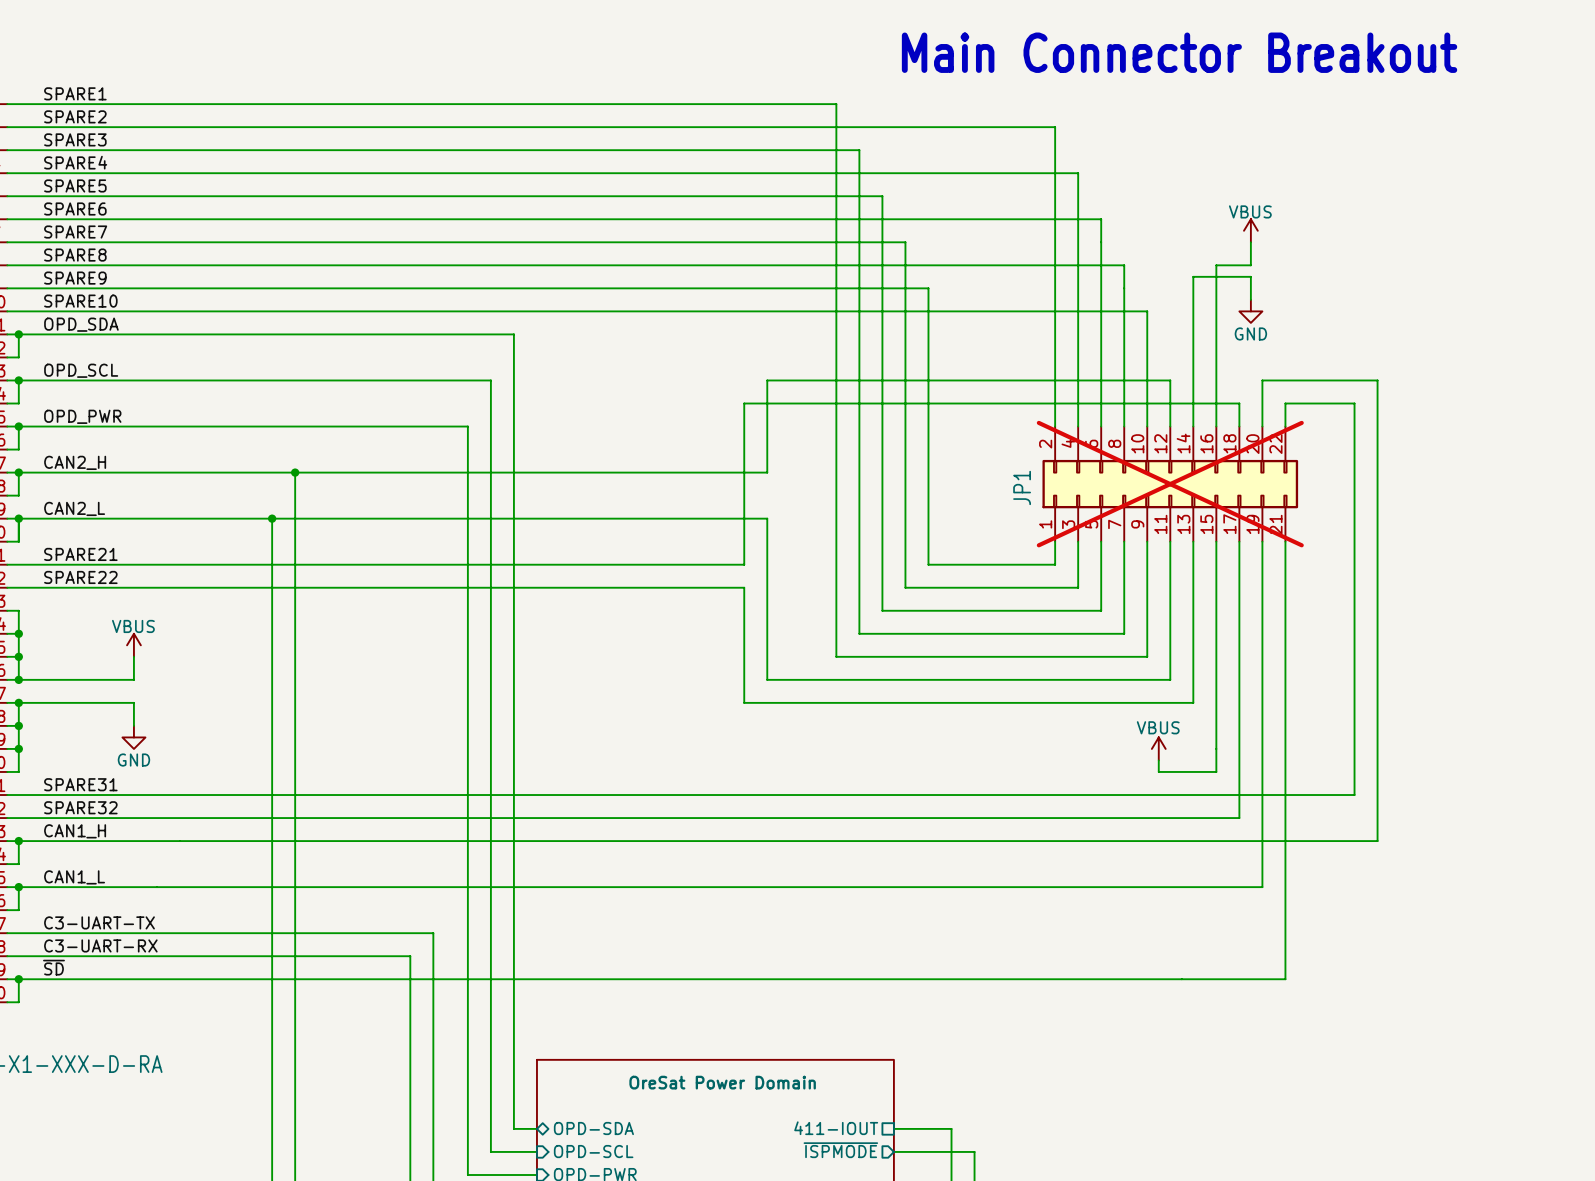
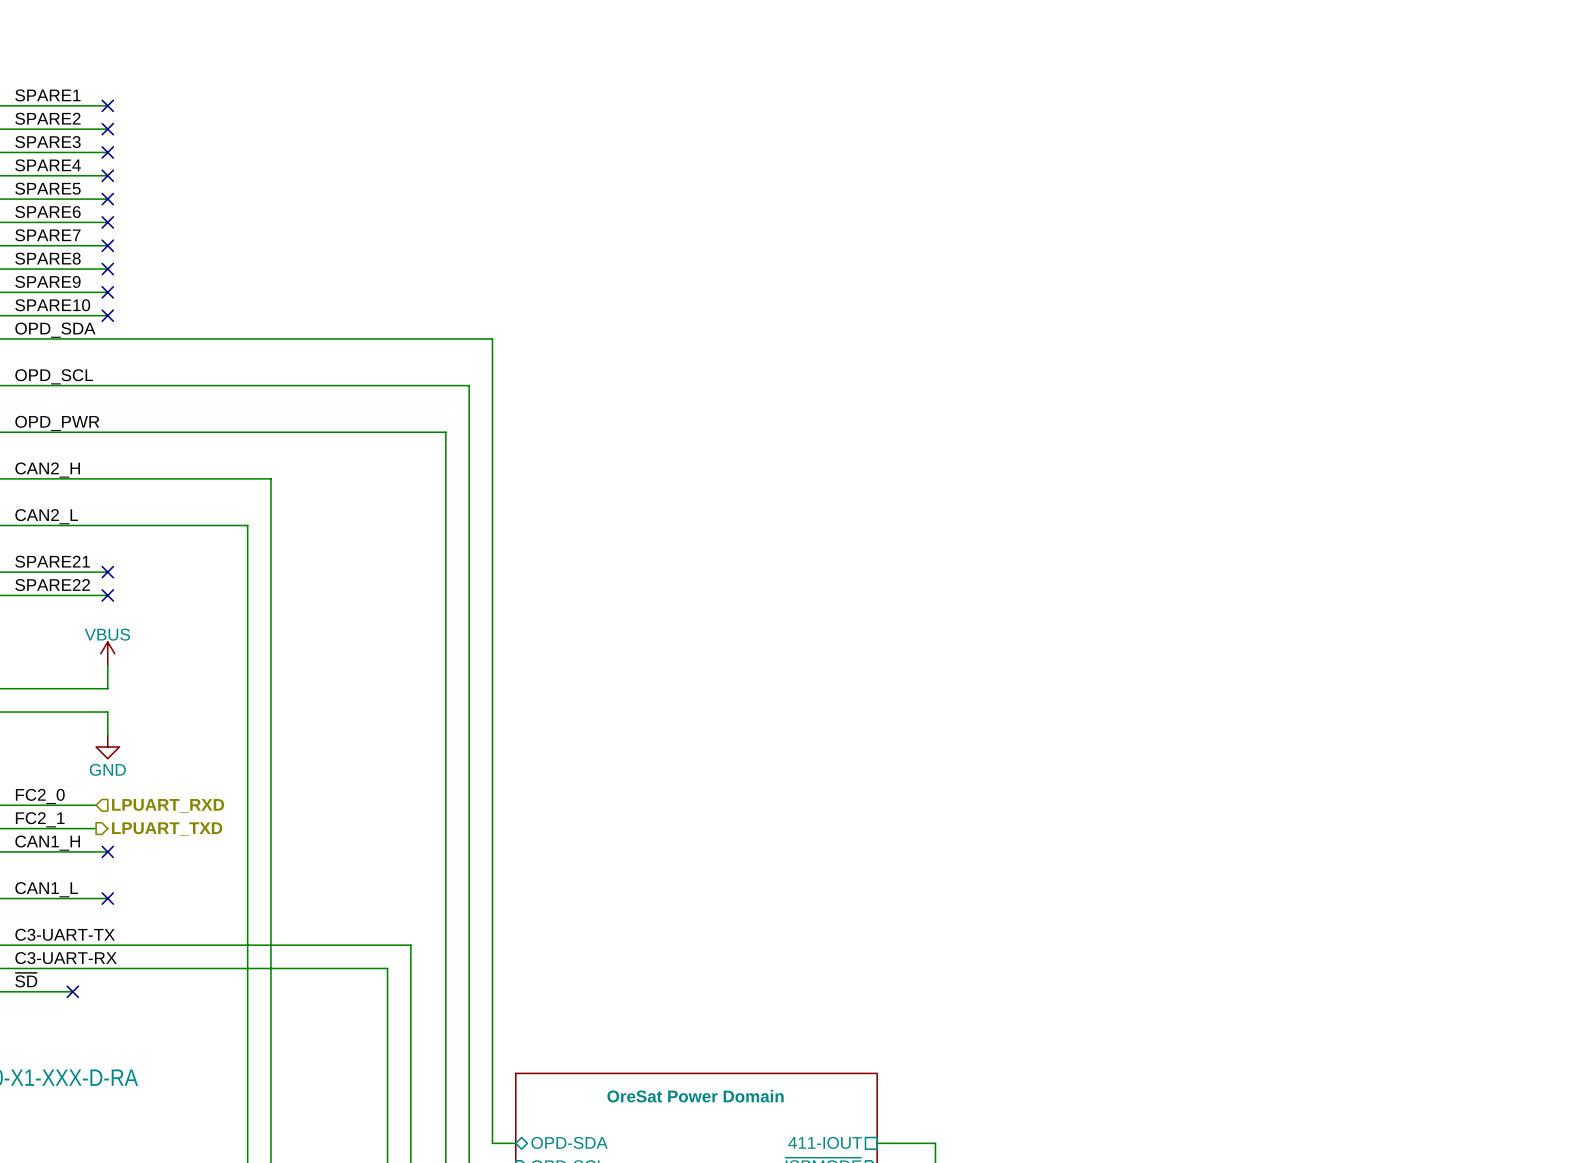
text: Main Connector Breakout (1179, 52) -> none
wire: (133, 104) (836, 104) (836, 656) (1147, 656) (1147, 541) -> none
no-connect mark: none -> (107, 105)
wire: (133, 127) (1055, 127) (1055, 426) -> none
no-connect mark: none -> (107, 129)
wire: (133, 150) (859, 150) (859, 633) (1124, 633) (1124, 541) -> none
no-connect mark: none -> (107, 152)
wire: (133, 173) (1078, 173) (1078, 426) -> none
no-connect mark: none -> (107, 175)
wire: (133, 196) (882, 196) (882, 610) (1101, 610) (1101, 541) -> none
no-connect mark: none -> (107, 199)
wire: (133, 219) (1101, 219) (1101, 426) -> none
no-connect mark: none -> (107, 222)
power symbol: VBUS (1250, 230) -> none
wire: (133, 242) (905, 242) (905, 587) (1078, 587) (1078, 541) -> none
no-connect mark: none -> (107, 245)
wire: (1250, 242) (1250, 265) (1216, 265) (1216, 426) -> none
wire: (133, 265) (1124, 265) (1124, 426) -> none
no-connect mark: none -> (107, 269)
wire: (133, 288) (928, 288) (928, 564) (1055, 564) (1055, 541) -> none
no-connect mark: none -> (107, 292)
wire: (1250, 299) (1250, 276) (1193, 276) (1193, 426) -> none
wire: (133, 311) (1147, 311) (1147, 426) -> none
no-connect mark: none -> (107, 315)
power symbol: GND (1250, 311) -> none
wire: (1170, 426) (1170, 380) (767, 380) (767, 472) (295, 472) -> none
wire: (1239, 426) (1239, 403) (744, 403) (744, 564) (133, 564) -> none
wire: (1262, 426) (1262, 380) (1377, 380) (1377, 841) (133, 841) -> none
wire: (1285, 426) (1285, 403) (1354, 403) (1354, 795) (122, 795) -> none
junction: (295, 472) -> none
JP1: (1170, 484) -> none
wire: (272, 518) (767, 518) (767, 679) (1170, 679) (1170, 541) -> none
junction: (272, 518) -> none
wire: (1193, 541) (1193, 702) (744, 702) (744, 587) (133, 587) -> none
wire: (1216, 541) (1216, 771) (1158, 771) (1158, 760) -> none
wire: (1239, 541) (1239, 818) (122, 818) -> none
wire: (1262, 541) (1262, 887) (133, 887) -> none
wire: (1285, 541) (1285, 979) (99, 979) -> none
no-connect mark: none -> (107, 572)
no-connect mark: none -> (107, 595)
power symbol: VBUS (1158, 748) -> none
label: SPARE31 (80, 784) -> FC2_0 (40, 796)
hierarchical label: none -> LPUART_RXD (168, 805)
label: SPARE32 (80, 807) -> FC2_1 (40, 819)
hierarchical label: none -> LPUART_TXD (167, 829)
no-connect mark: none -> (107, 851)
no-connect mark: none -> (107, 898)
no-connect mark: none -> (72, 991)

